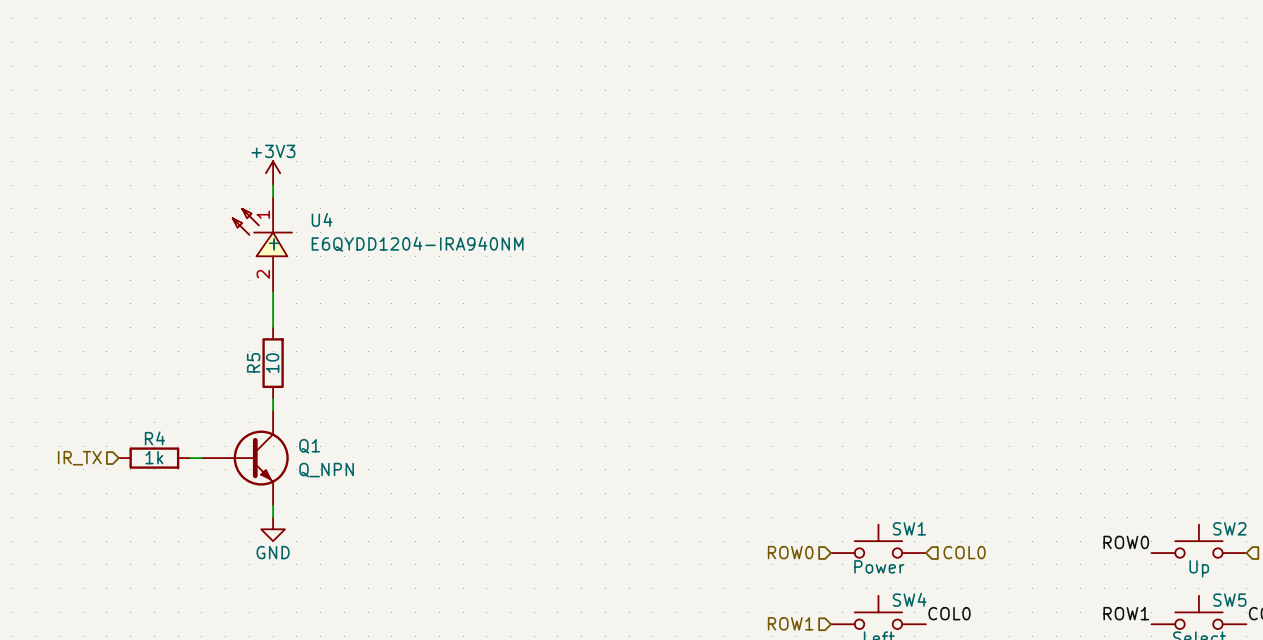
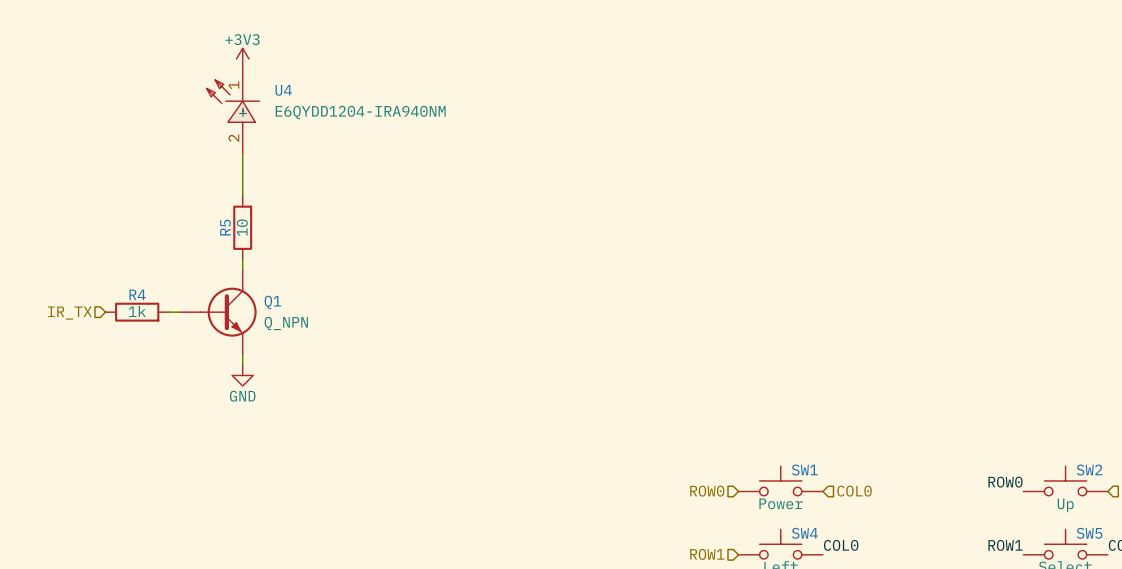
power symbol position: +3V3 (273, 173) -> +3V3 (242, 58)
U4 position: (262, 244) -> (233, 111)
R5 position: (273, 363) -> (242, 227)
hierarchical label position: IR_TX (79, 458) -> IR_TX (69, 313)
R4 position: (154, 458) -> (137, 312)
wire: (190, 458) (201, 458) -> (168, 312) (179, 312)
Q1 position: (245, 458) -> (218, 312)
wire: (273, 505) (273, 517) -> none
power symbol position: GND (273, 529) -> GND (242, 375)

